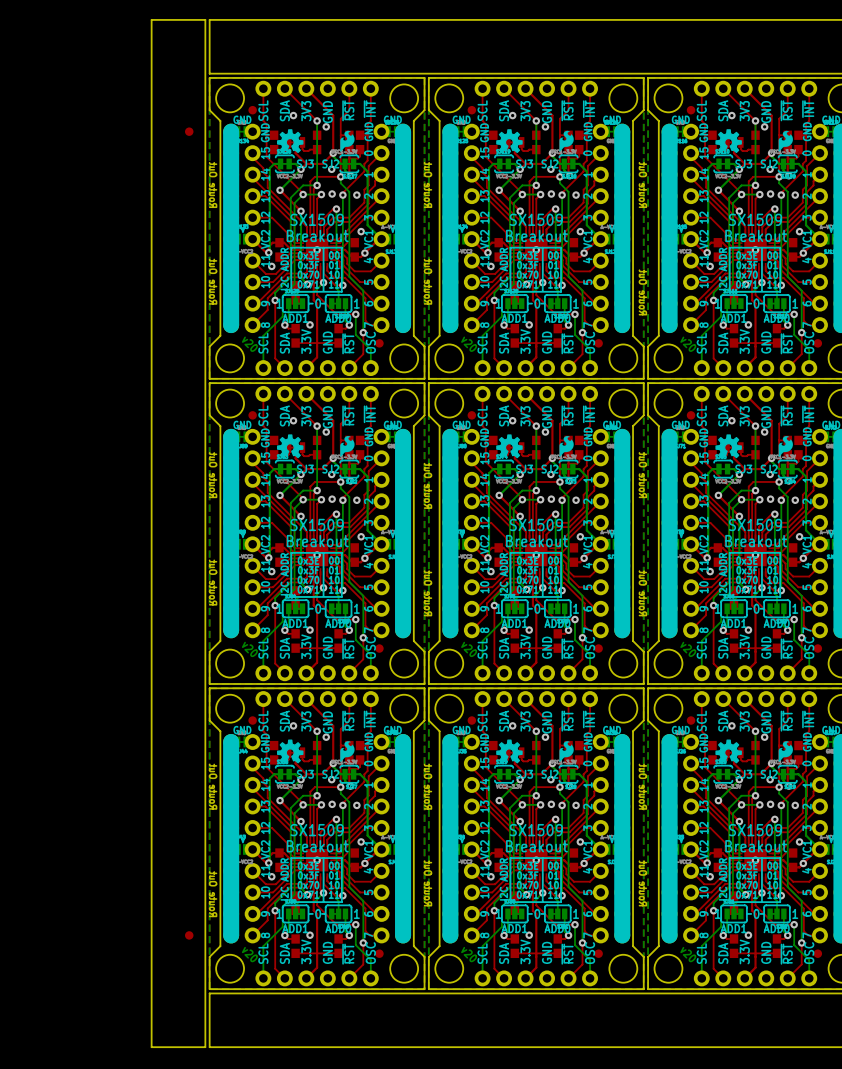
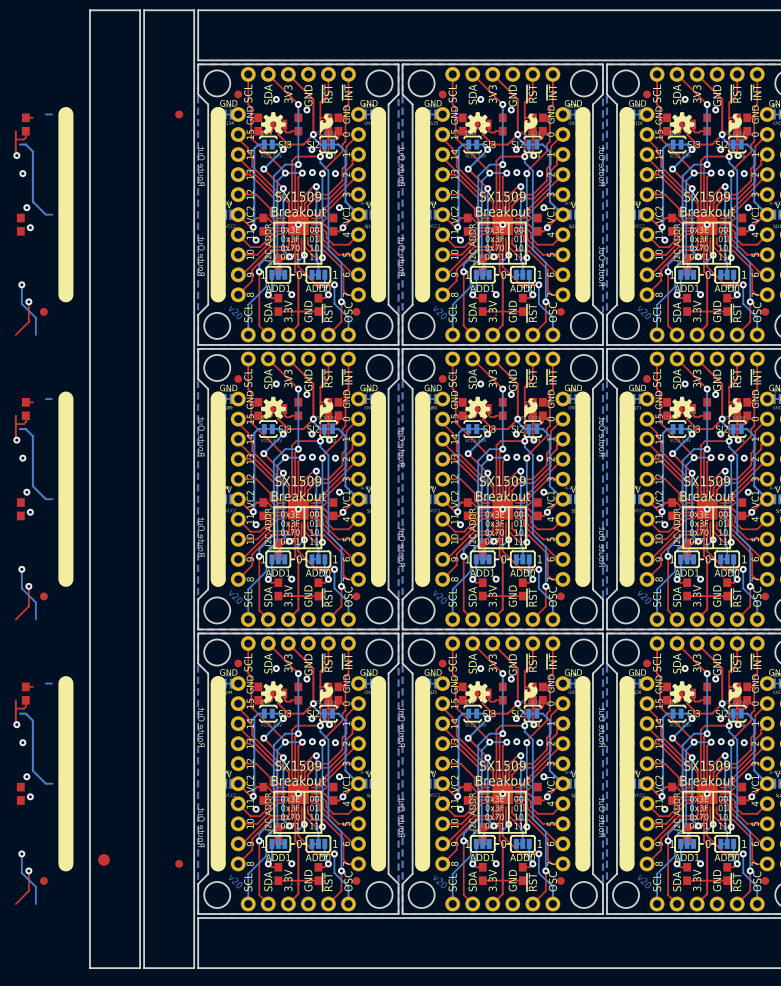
board edge: none -> (140, 10) (140, 968) (89, 968) (89, 10) (140, 10)
bottom track: none -> (51, 114) (45, 114)
line: none -> (65, 114) (65, 294)
top track: none -> (32, 117) (25, 117)
part: none -> (25, 124)
top track: none -> (15, 131) (16, 155)
top track: none -> (25, 131) (23, 139) (15, 139)
bottom track: none -> (19, 144) (25, 144) (32, 151) (32, 201) (45, 214) (52, 214)
via: none -> (16, 155)
via: none -> (22, 173)
via: none -> (26, 207)
part: none -> (20, 224)
via: none -> (30, 227)
bottom track: none -> (21, 284) (21, 303) (35, 317) (35, 334)
via: none -> (21, 284)
top track: none -> (28, 301) (28, 321) (15, 334)
via: none -> (28, 301)
part: none -> (43, 311)
bottom track: none -> (51, 399) (45, 399)
line: none -> (65, 399) (65, 579)
top track: none -> (32, 402) (25, 402)
part: none -> (25, 409)
top track: none -> (15, 415) (16, 440)
top track: none -> (25, 415) (23, 424) (15, 424)
bottom track: none -> (19, 429) (25, 429) (32, 436) (32, 486) (45, 499) (52, 499)
via: none -> (16, 440)
via: none -> (22, 458)
via: none -> (26, 492)
part: none -> (20, 509)
via: none -> (30, 512)
bottom track: none -> (21, 569) (21, 588) (35, 602) (35, 619)
via: none -> (21, 569)
top track: none -> (28, 586) (28, 606) (15, 619)
via: none -> (28, 586)
part: none -> (43, 596)
bottom track: none -> (51, 683) (45, 683)
line: none -> (65, 683) (65, 863)
top track: none -> (32, 686) (25, 686)
part: none -> (25, 693)
top track: none -> (15, 700) (16, 724)
top track: none -> (25, 700) (23, 708) (15, 708)
bottom track: none -> (19, 713) (25, 713) (32, 720) (32, 770) (45, 783) (52, 783)
via: none -> (16, 724)
via: none -> (22, 742)
via: none -> (26, 776)
part: none -> (20, 793)
via: none -> (30, 796)
bottom track: none -> (21, 853) (21, 872) (35, 886) (35, 904)
via: none -> (21, 853)
part: none -> (104, 859)
top track: none -> (28, 870) (28, 890) (15, 904)
via: none -> (28, 870)
part: none -> (43, 880)

